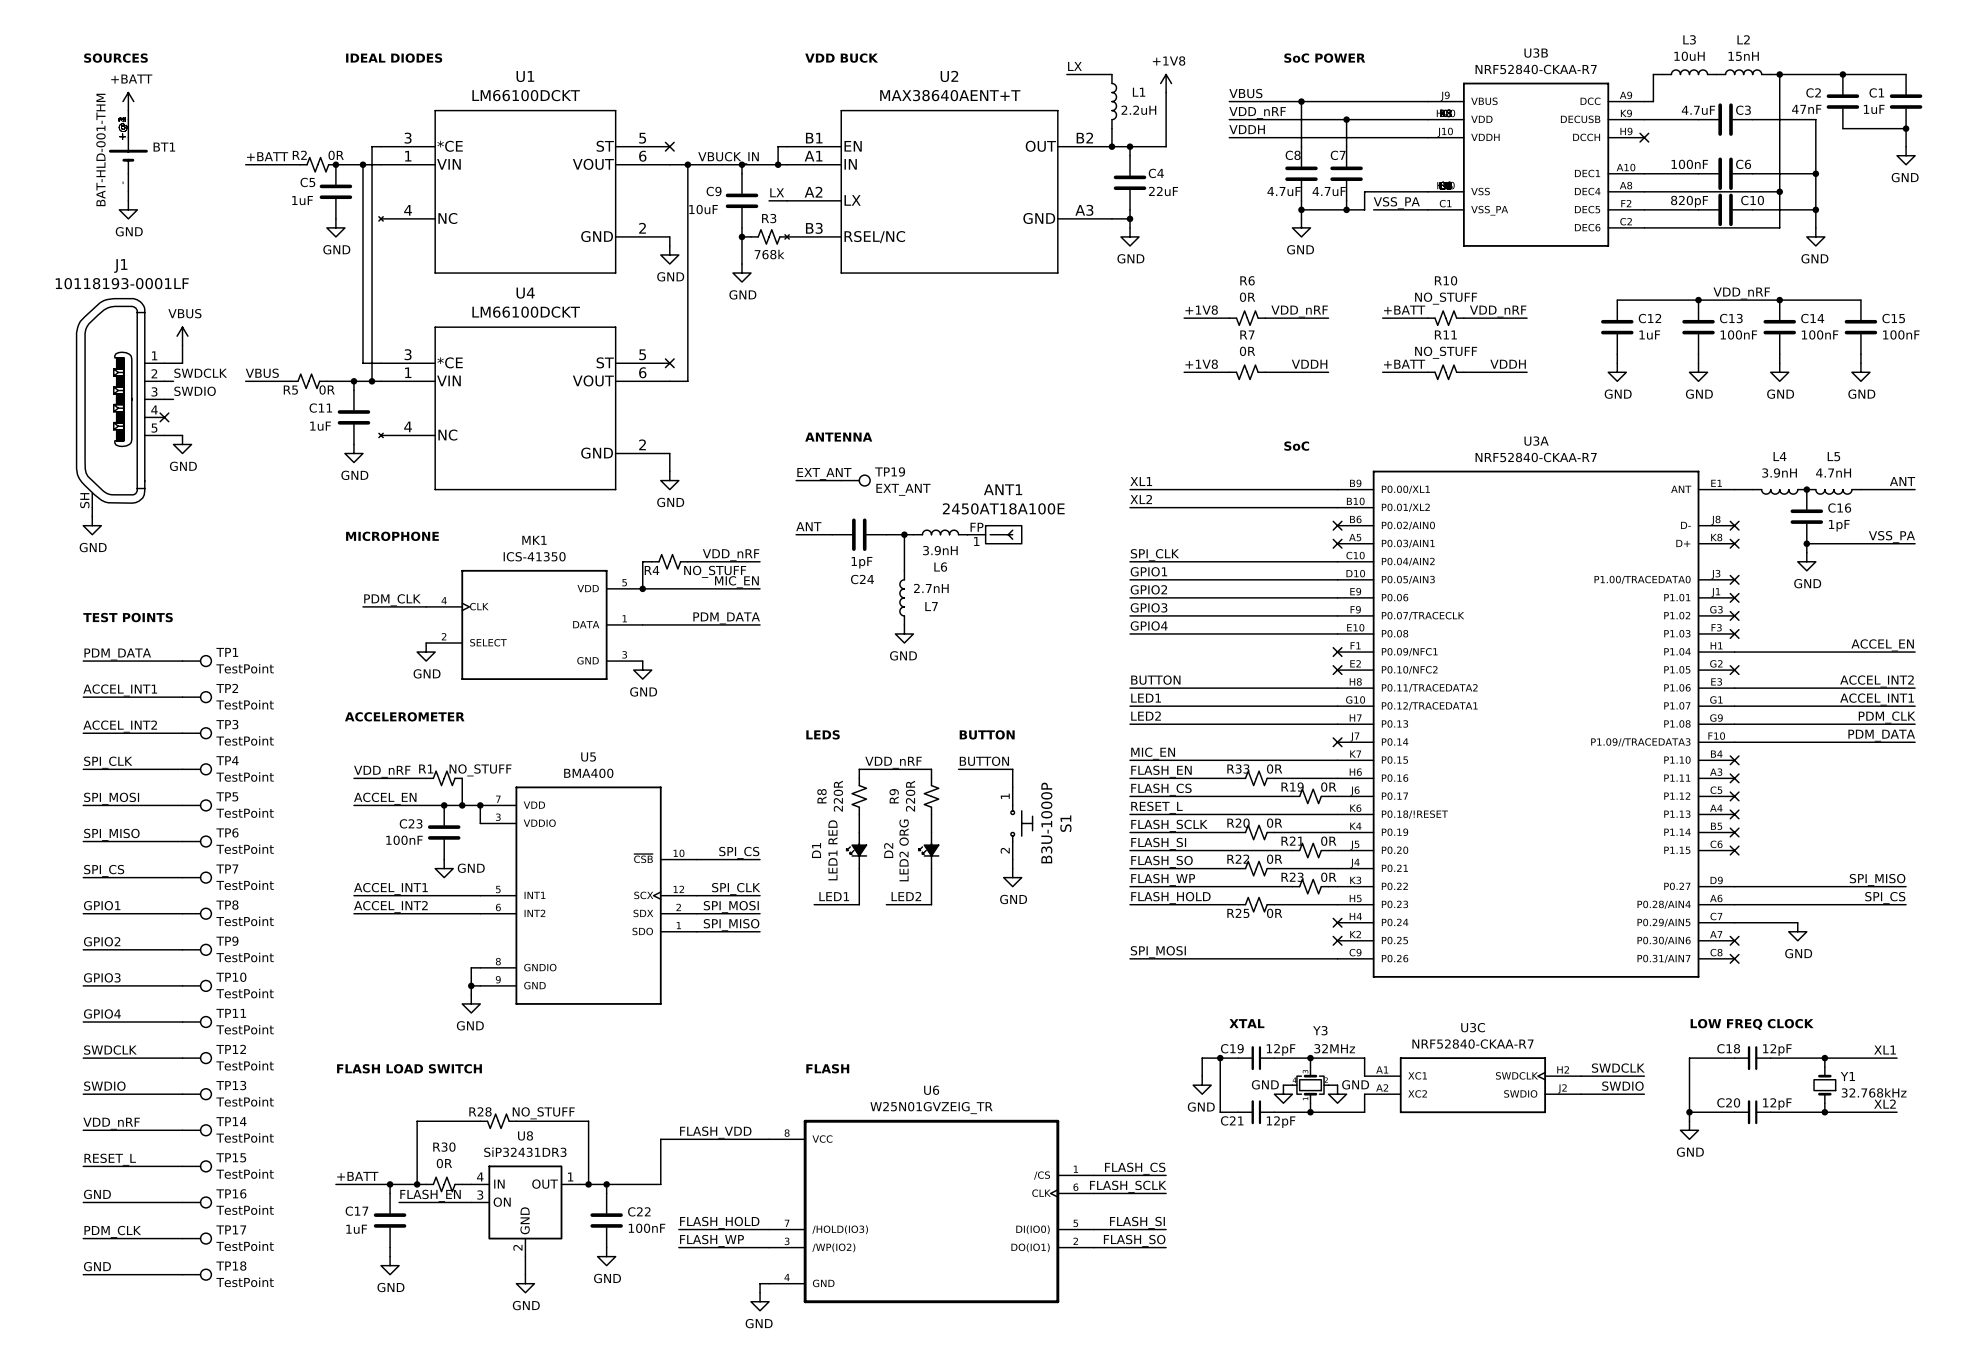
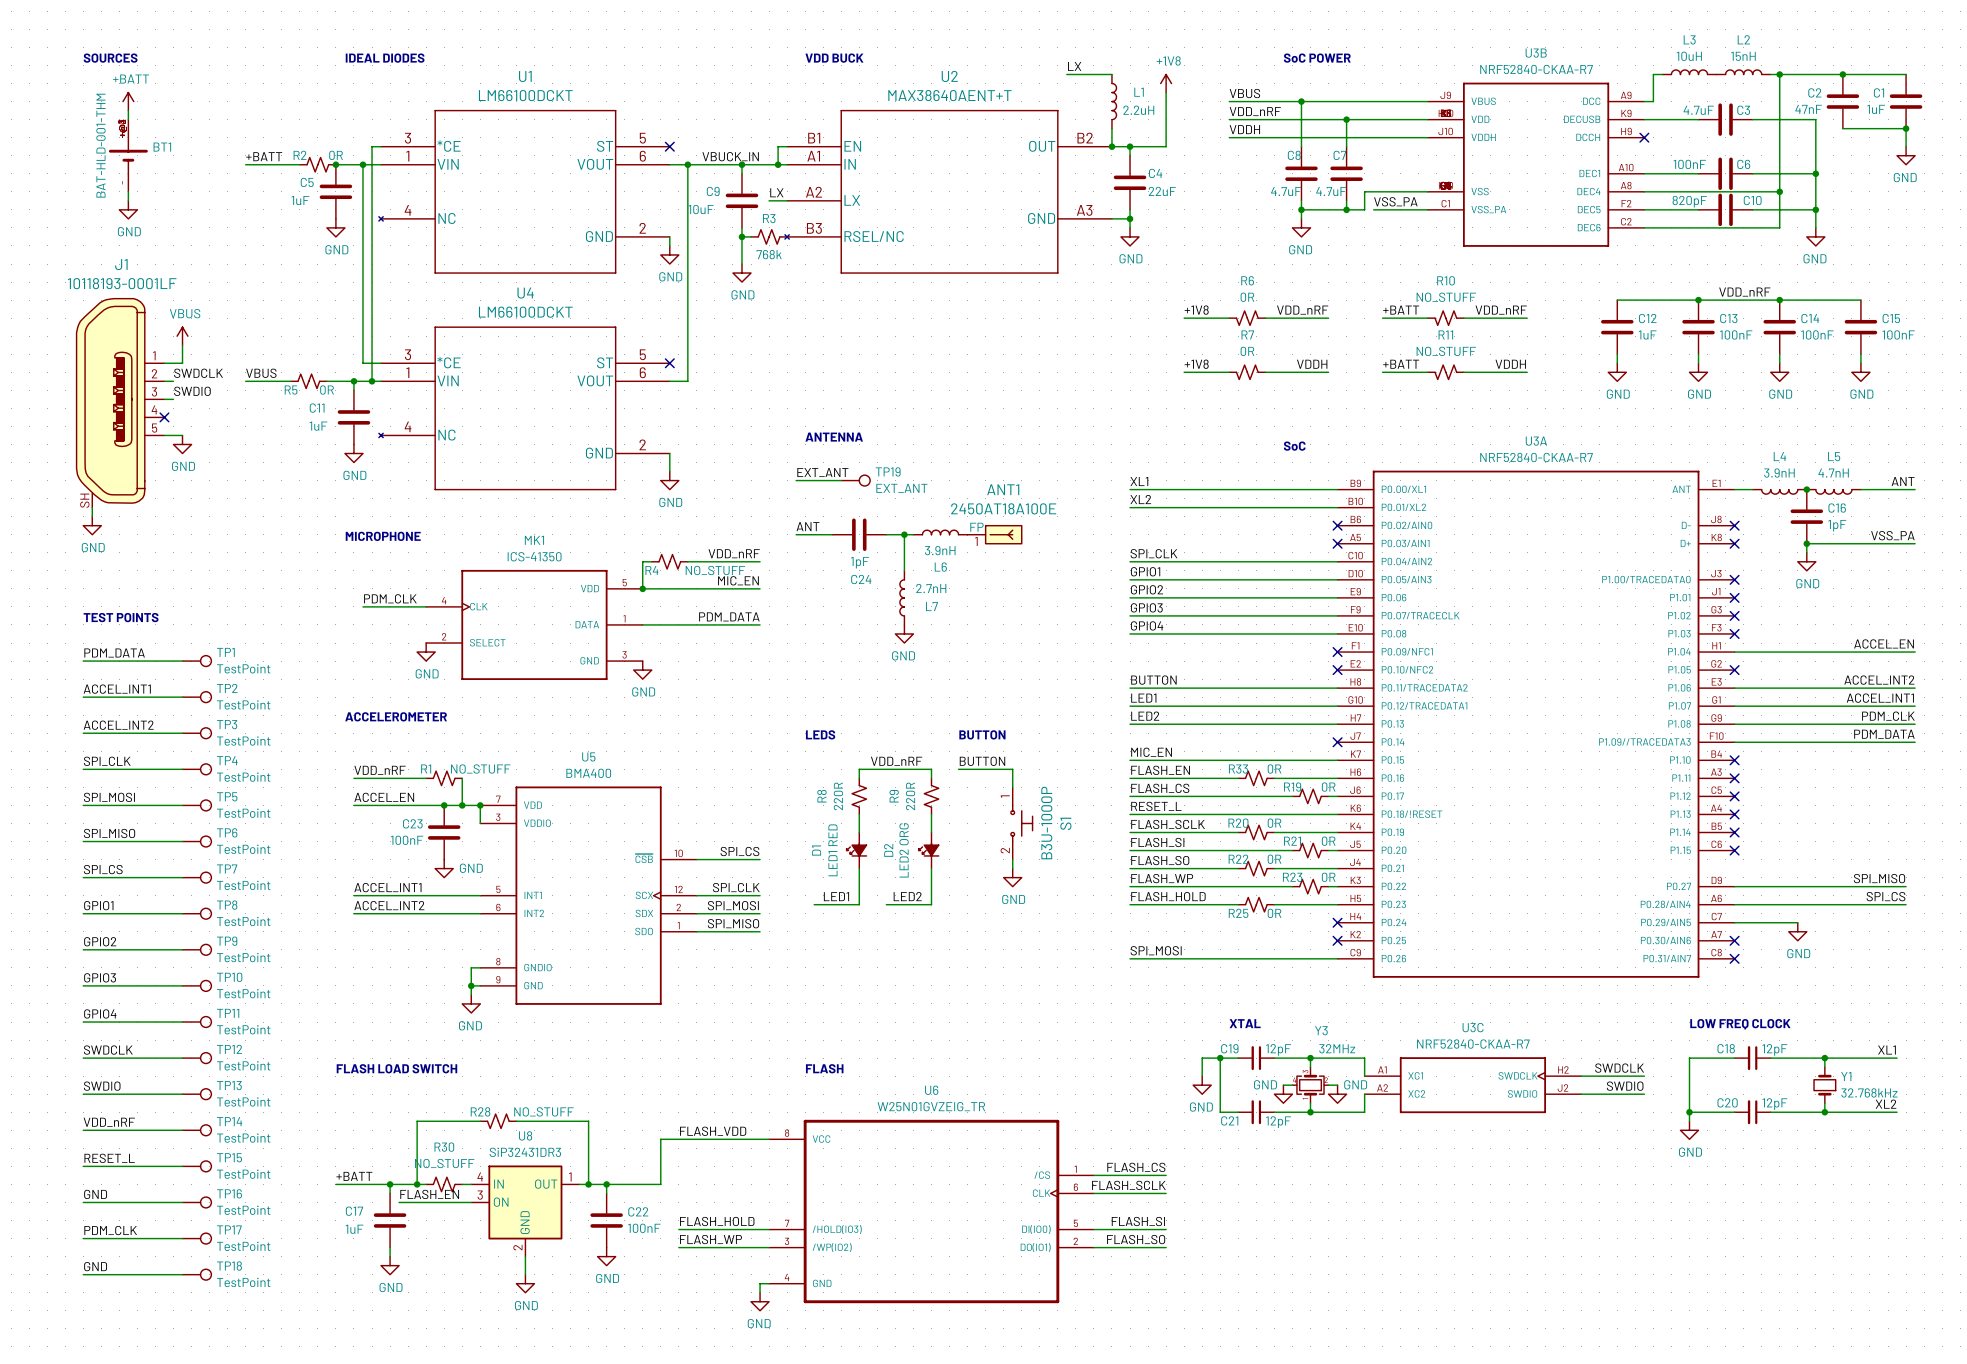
R30 value: 0R (444, 1163) -> NO_STUFF (444, 1163)

